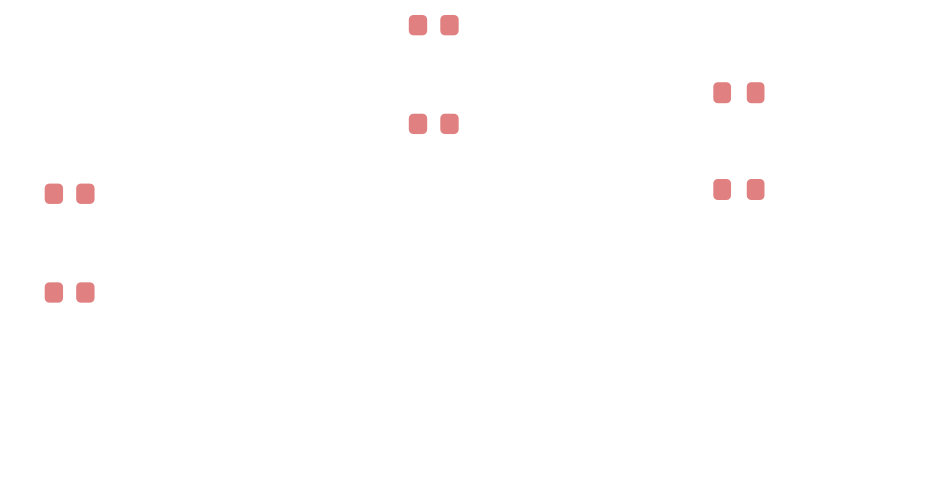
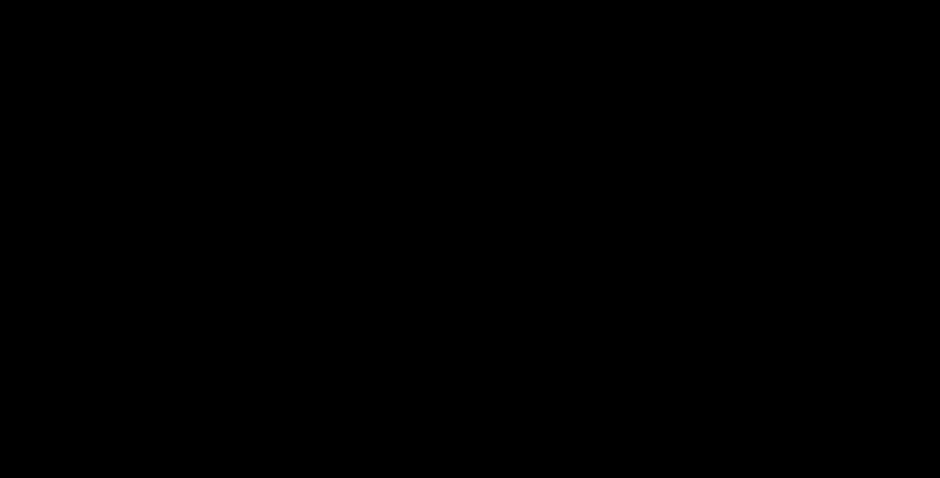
part: (433, 25) -> none
part: (738, 92) -> none
part: (433, 123) -> none
part: (738, 189) -> none
part: (69, 193) -> none
part: (69, 292) -> none

